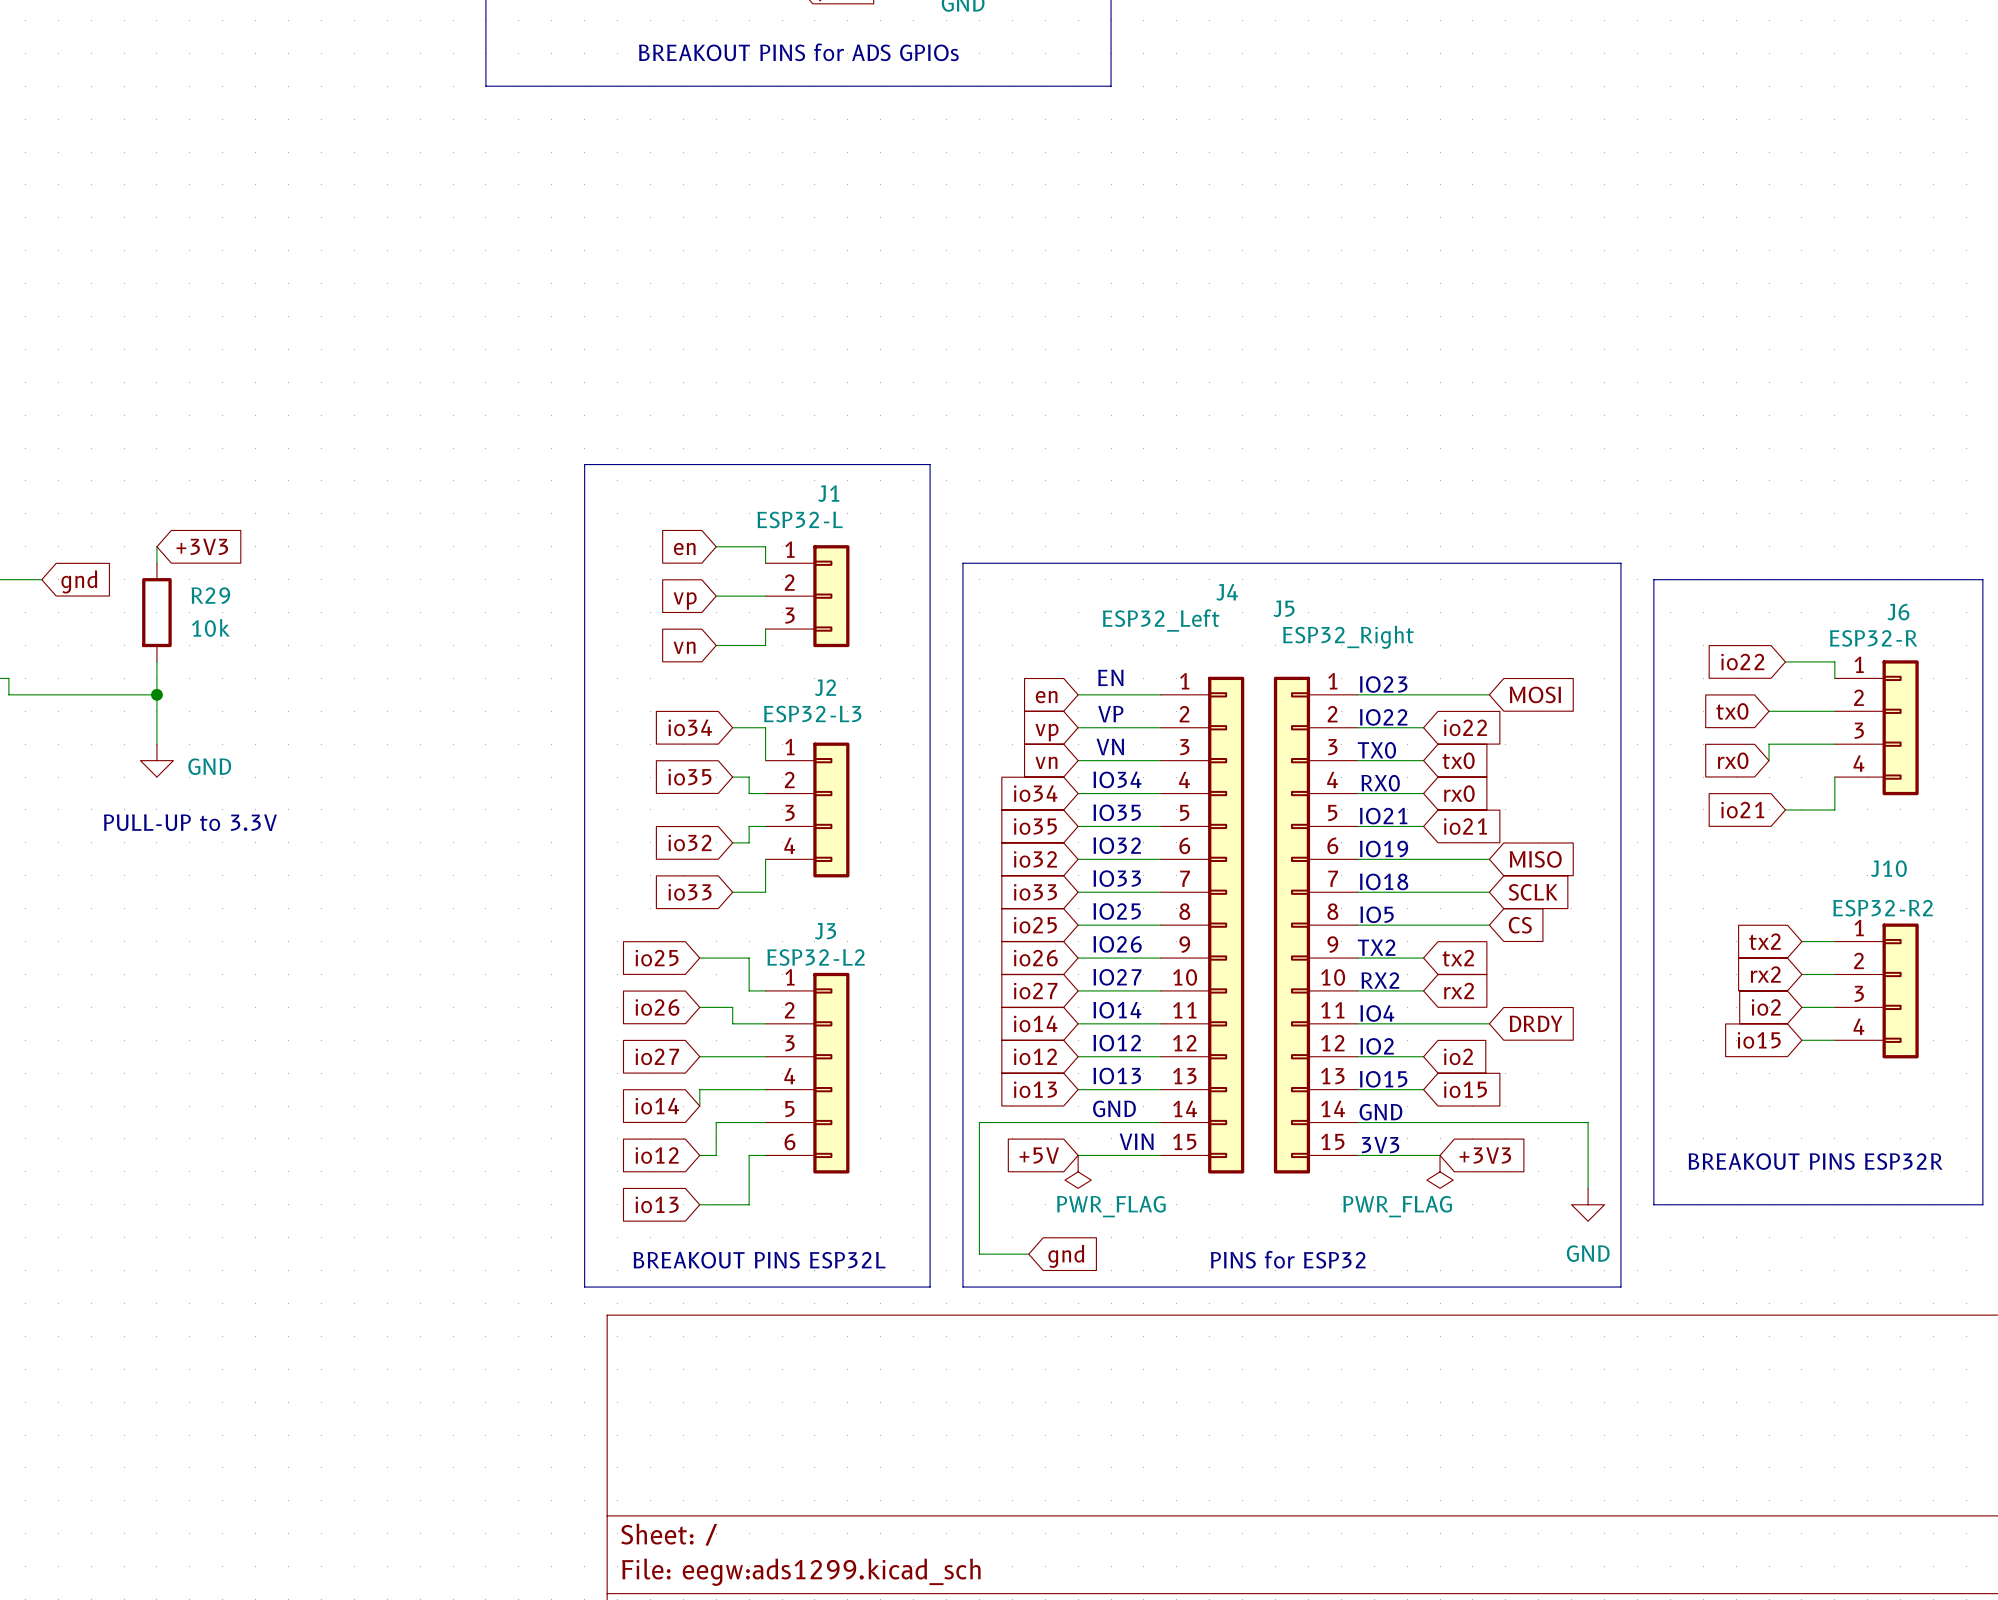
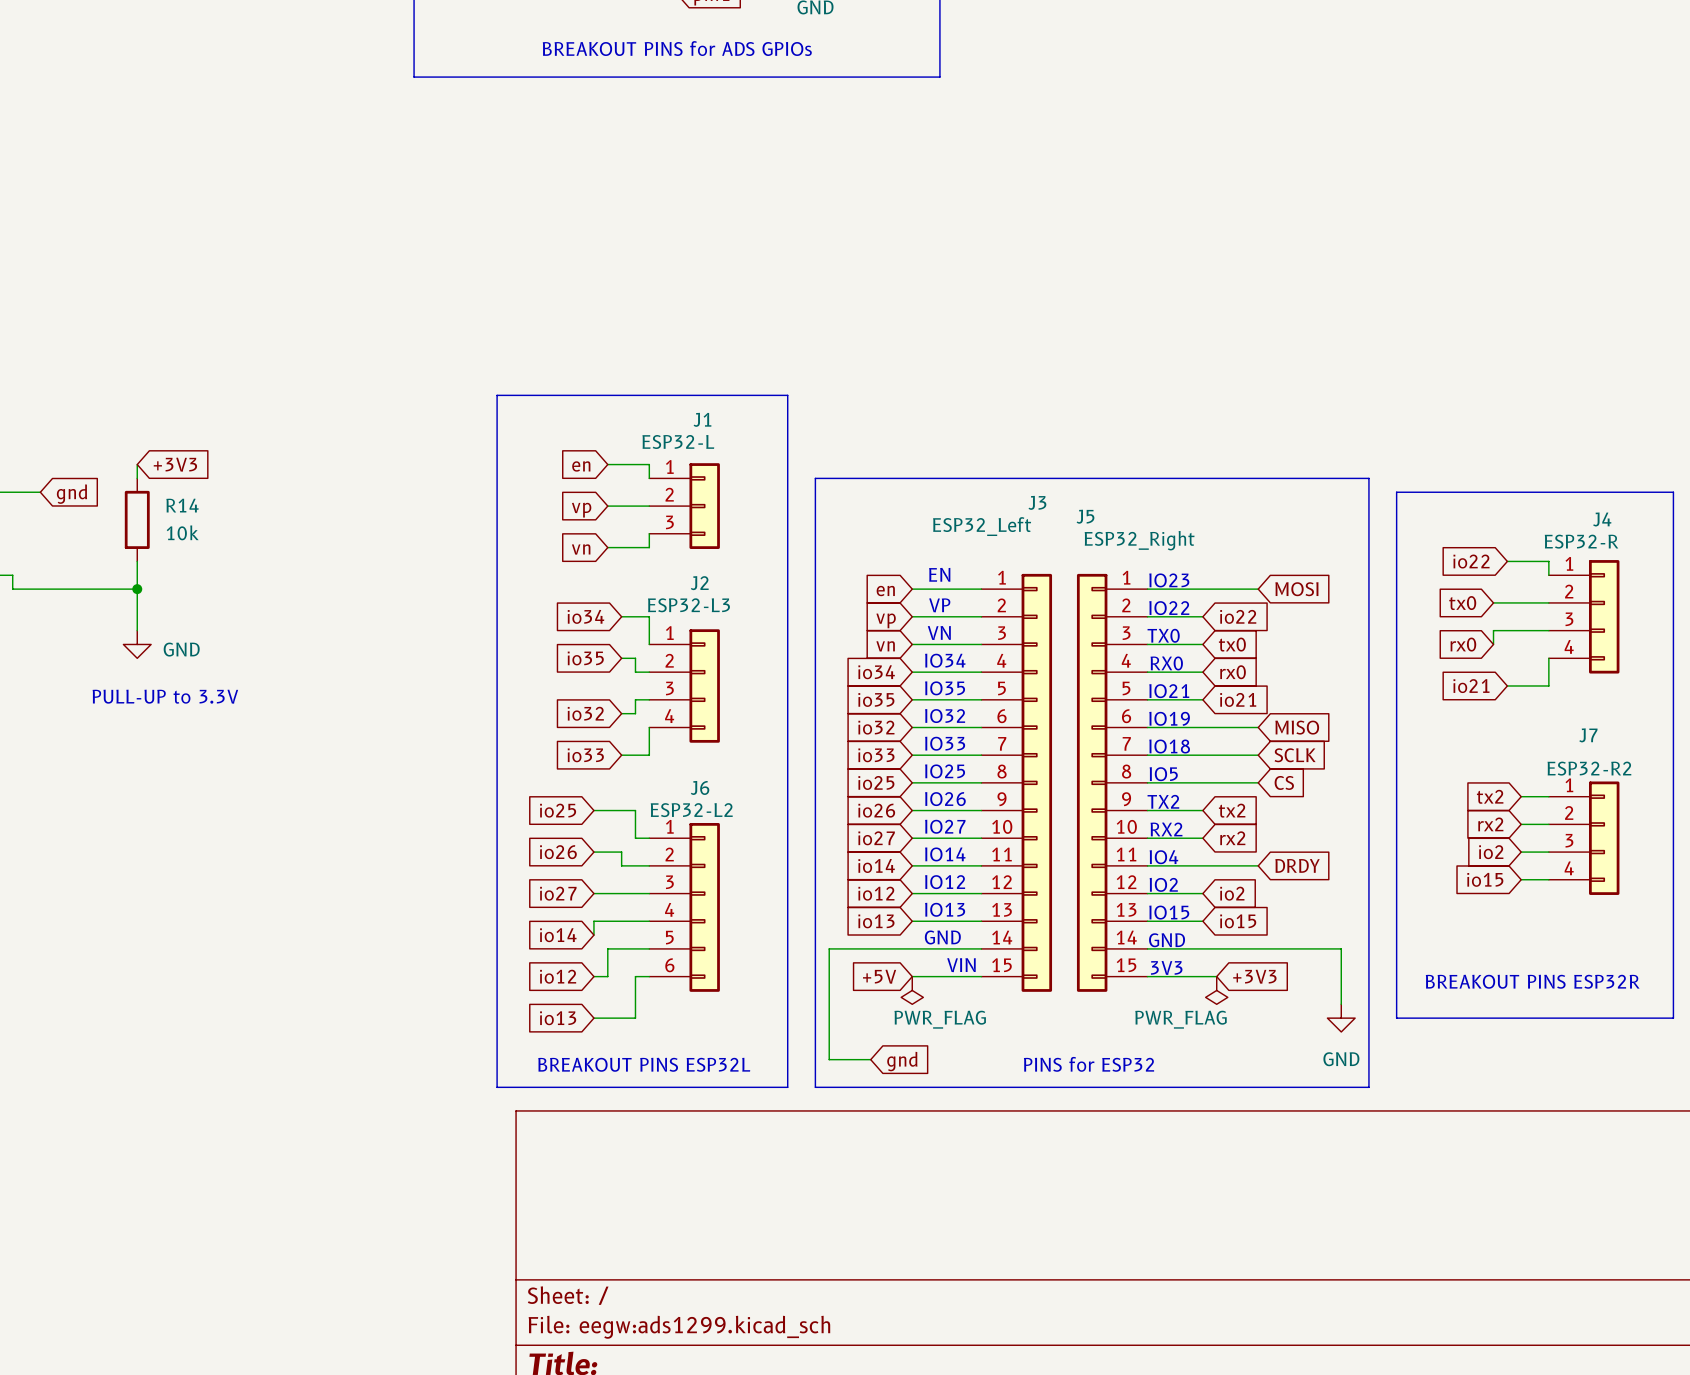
J4 name: J4 (1227, 592) -> J3 (1037, 502)
R29 name: R29 (210, 595) -> R14 (182, 505)
J6 name: J6 (1898, 612) -> J4 (1602, 519)
J10 name: J10 (1888, 868) -> J7 (1588, 735)
J3 name: J3 (825, 931) -> J6 (700, 787)

